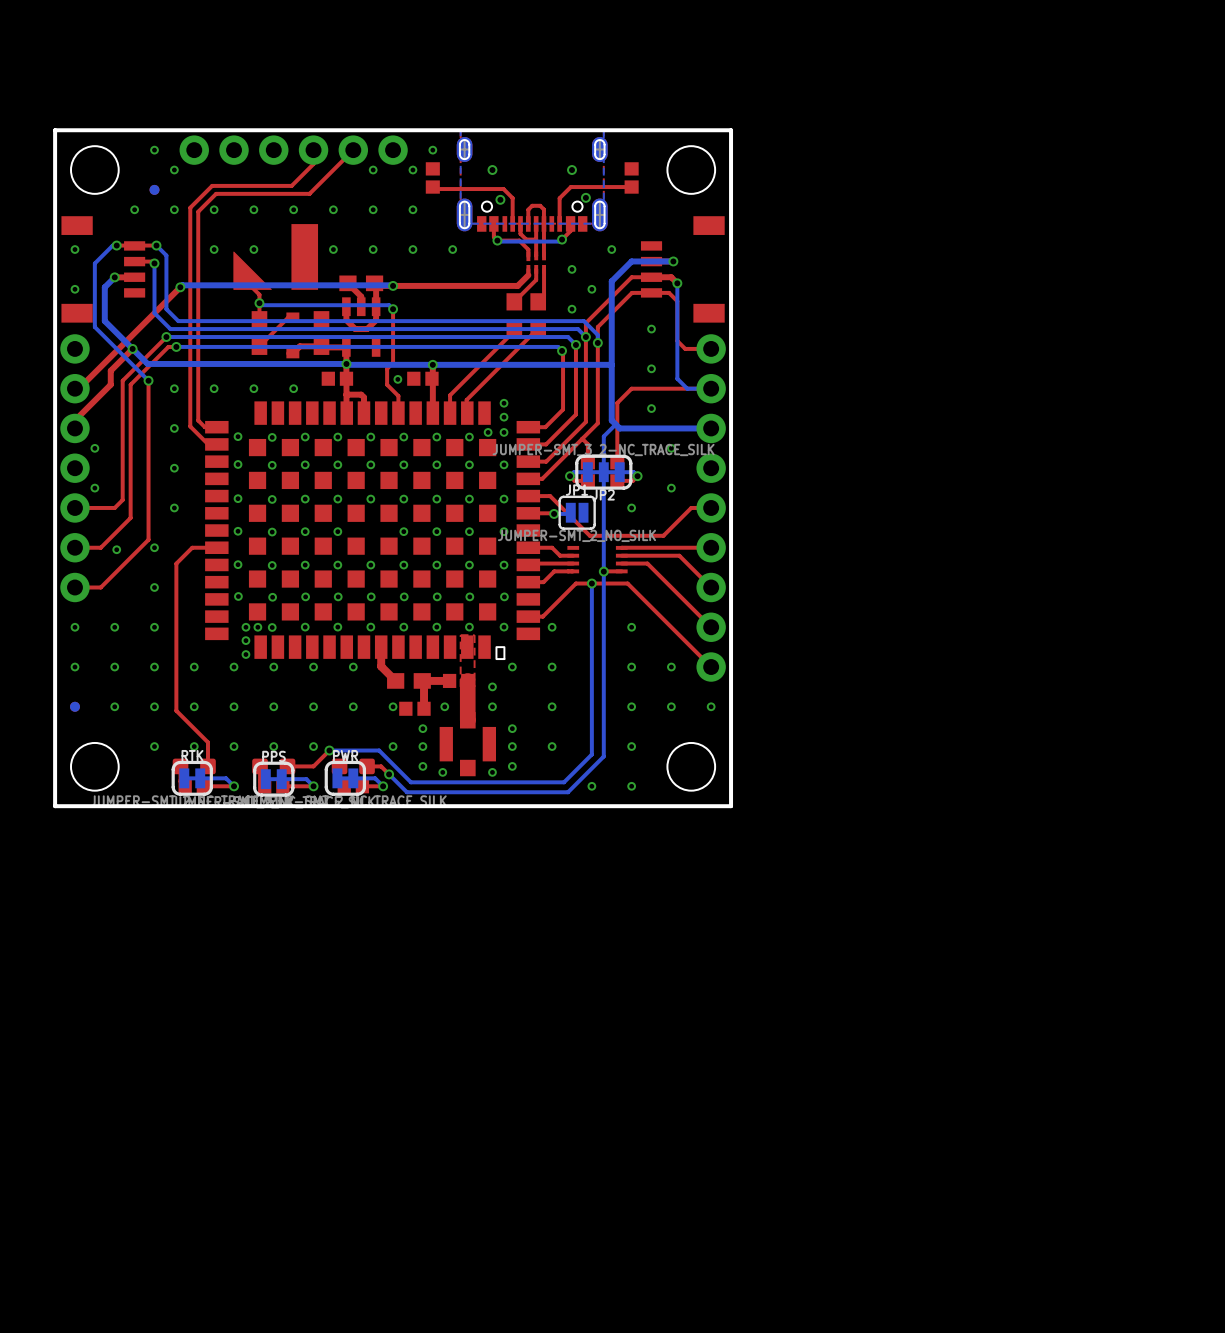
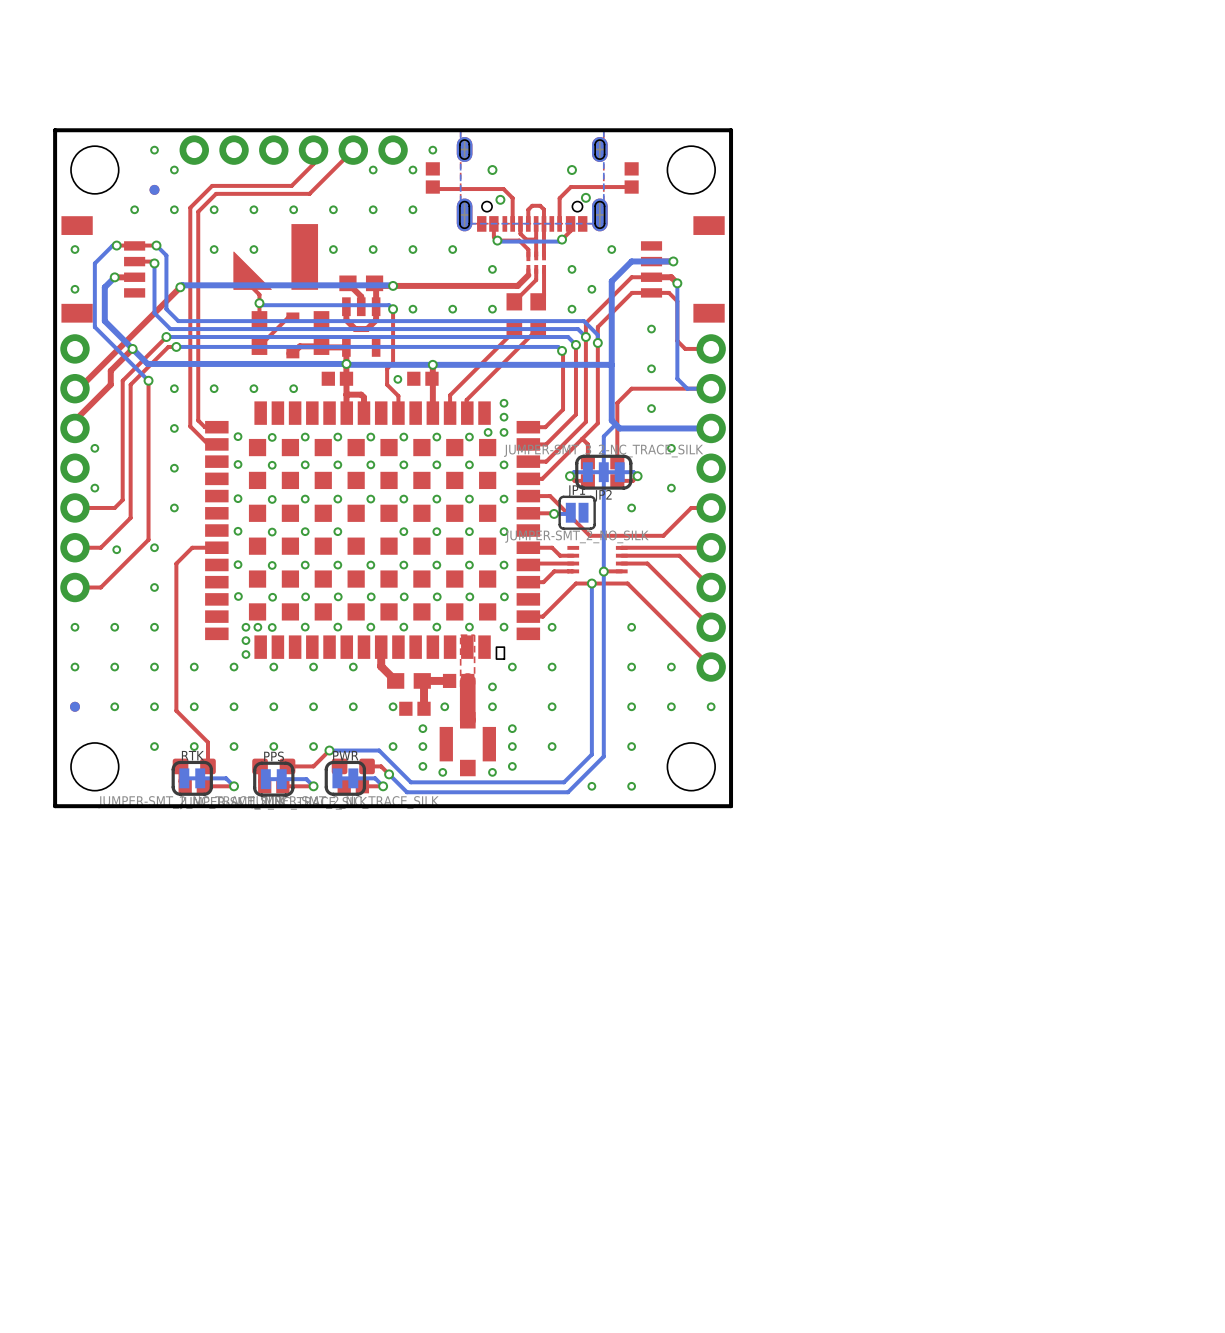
via: none -> (492, 269)
via: none -> (412, 309)
via: none -> (452, 309)
via: none -> (492, 309)

